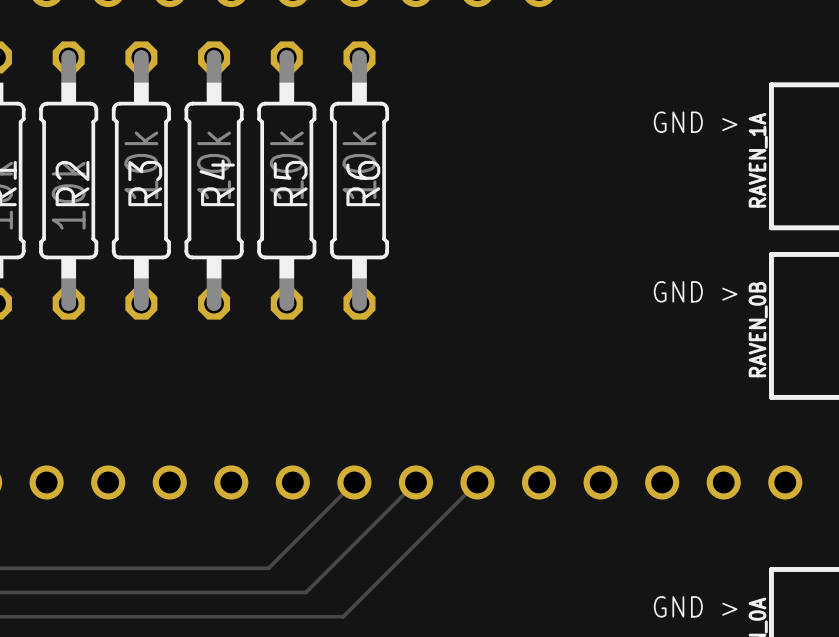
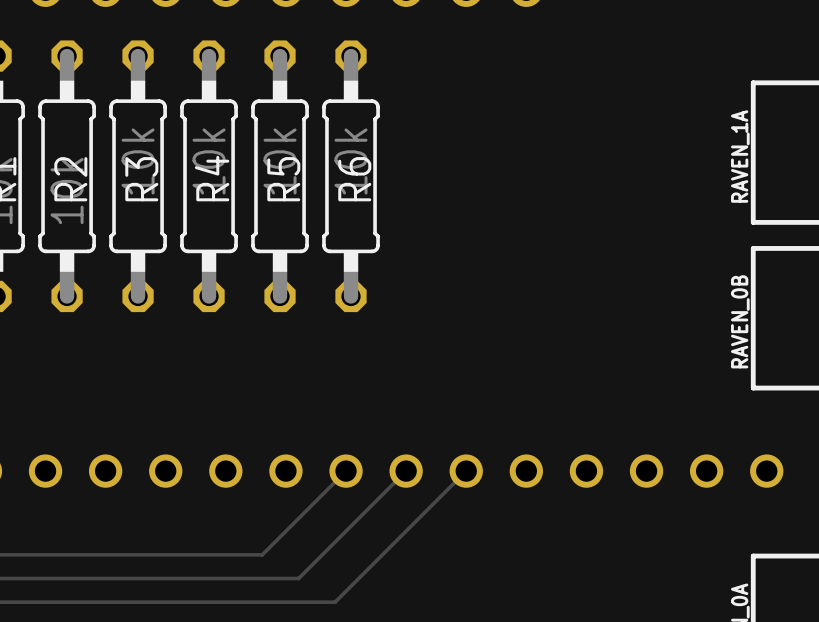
text: GND > (695, 122) -> none
text: GND > (695, 291) -> none
text: GND > (695, 606) -> none

